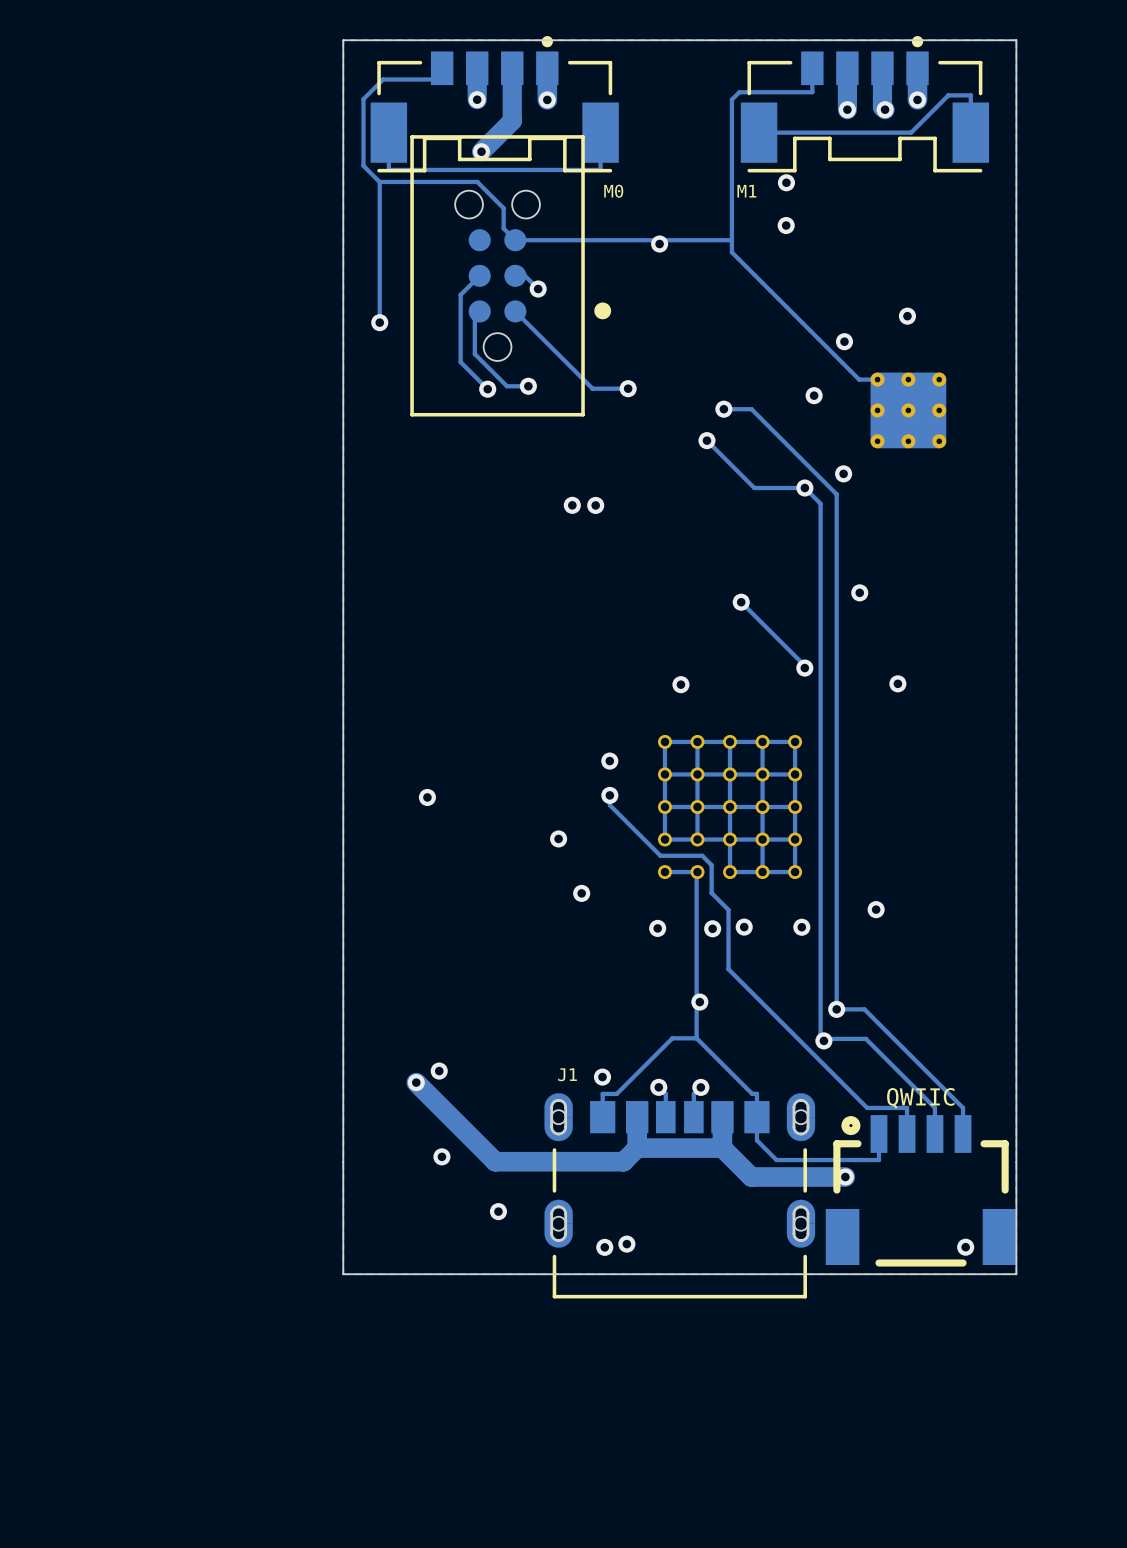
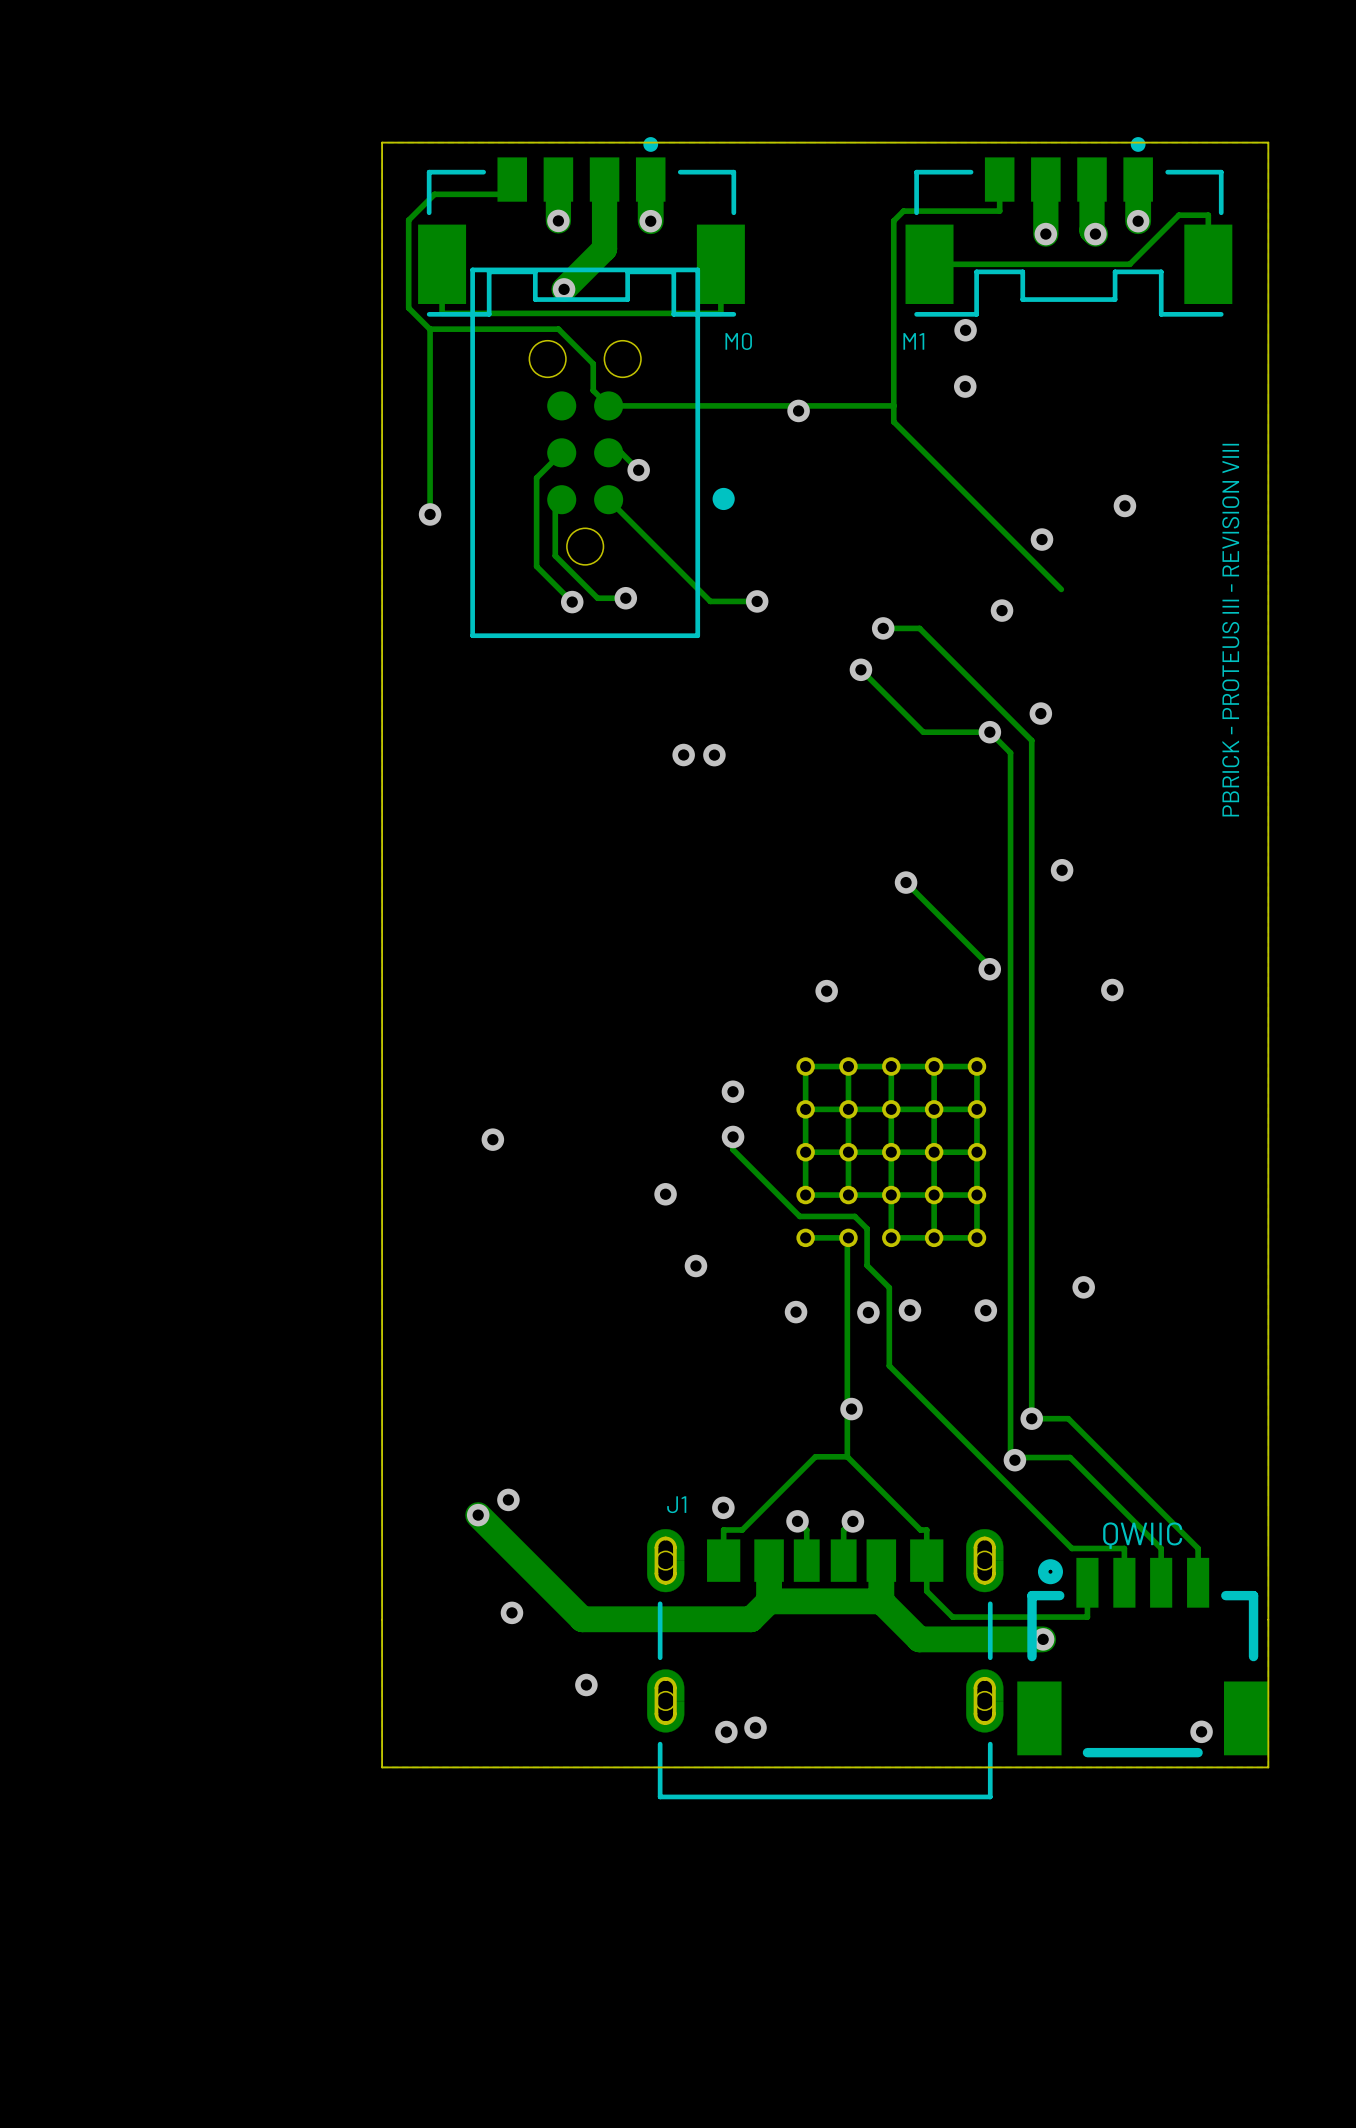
track: (877, 379) (859, 379) -> none
part: (908, 410) -> none
text: none -> PBRICK - PROTEUS III - REVISION VIII (1230, 630)

